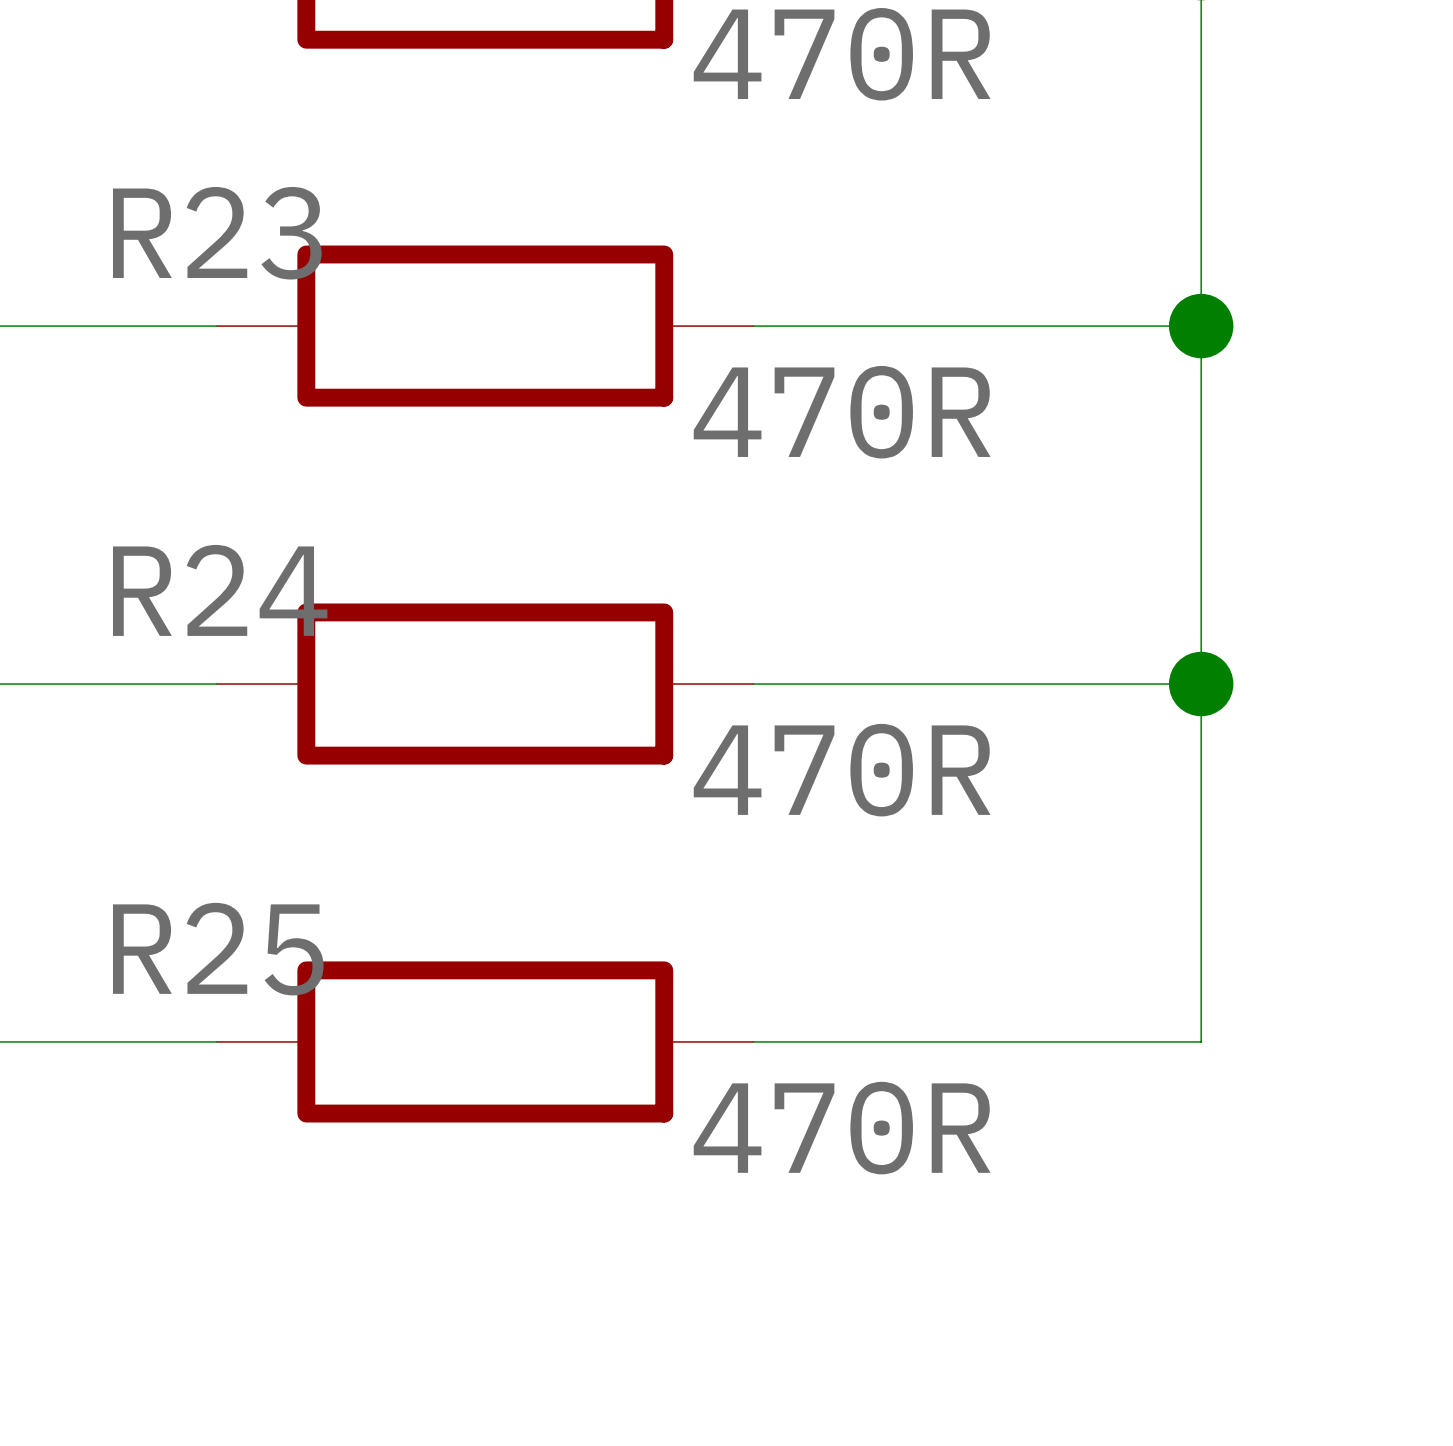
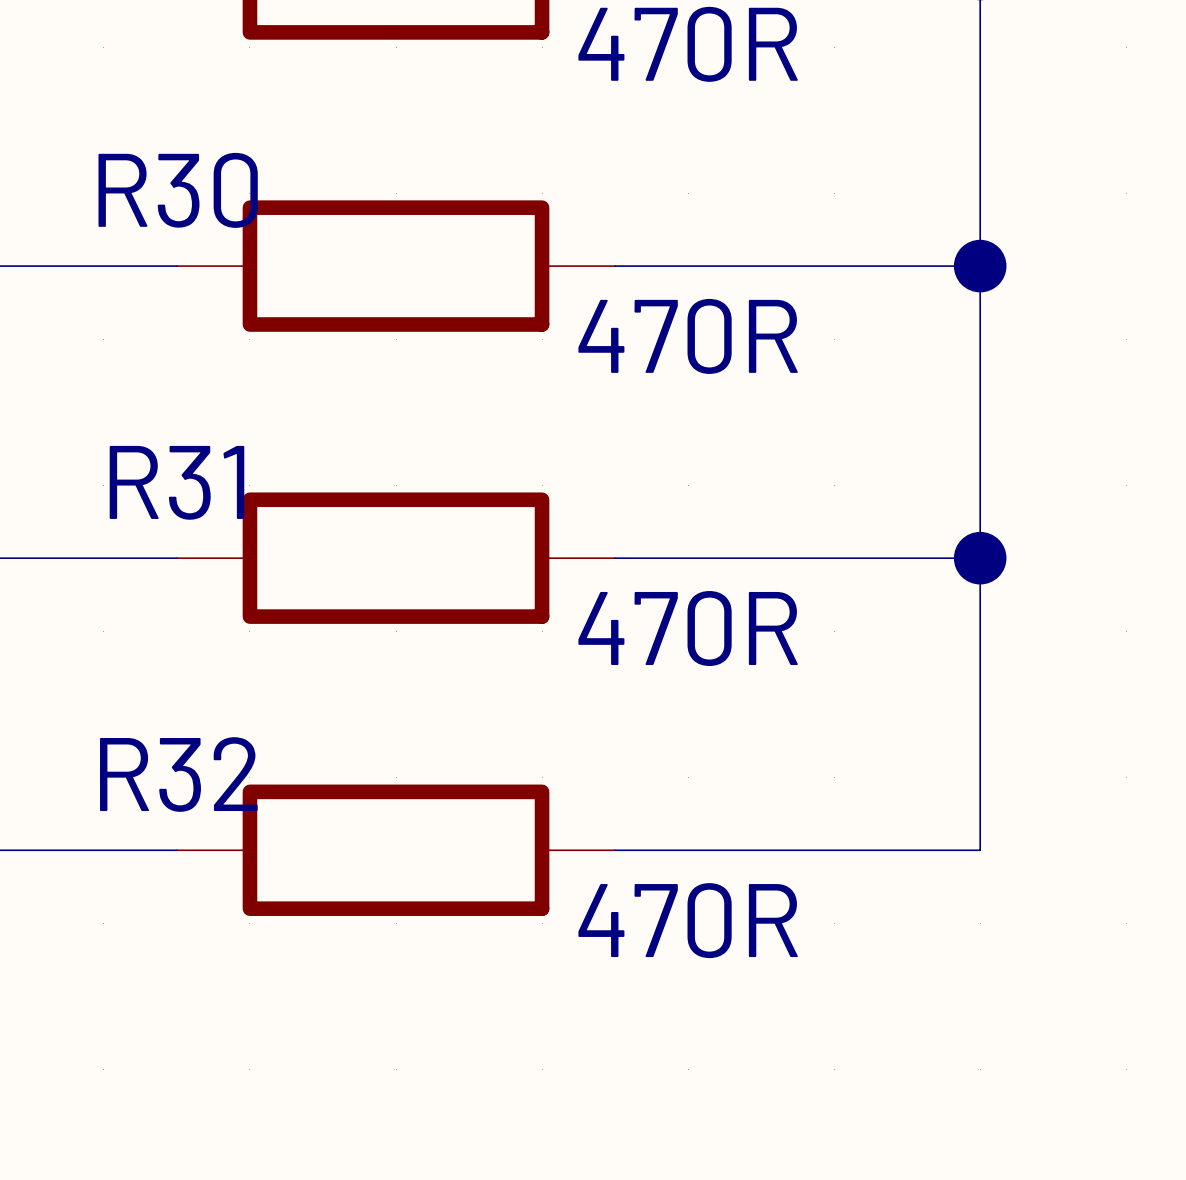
R23 name: R23 (217, 233) -> R30 (178, 190)
R24 name: R24 (220, 590) -> R31 (176, 482)
R25 name: R25 (218, 949) -> R32 (178, 774)

